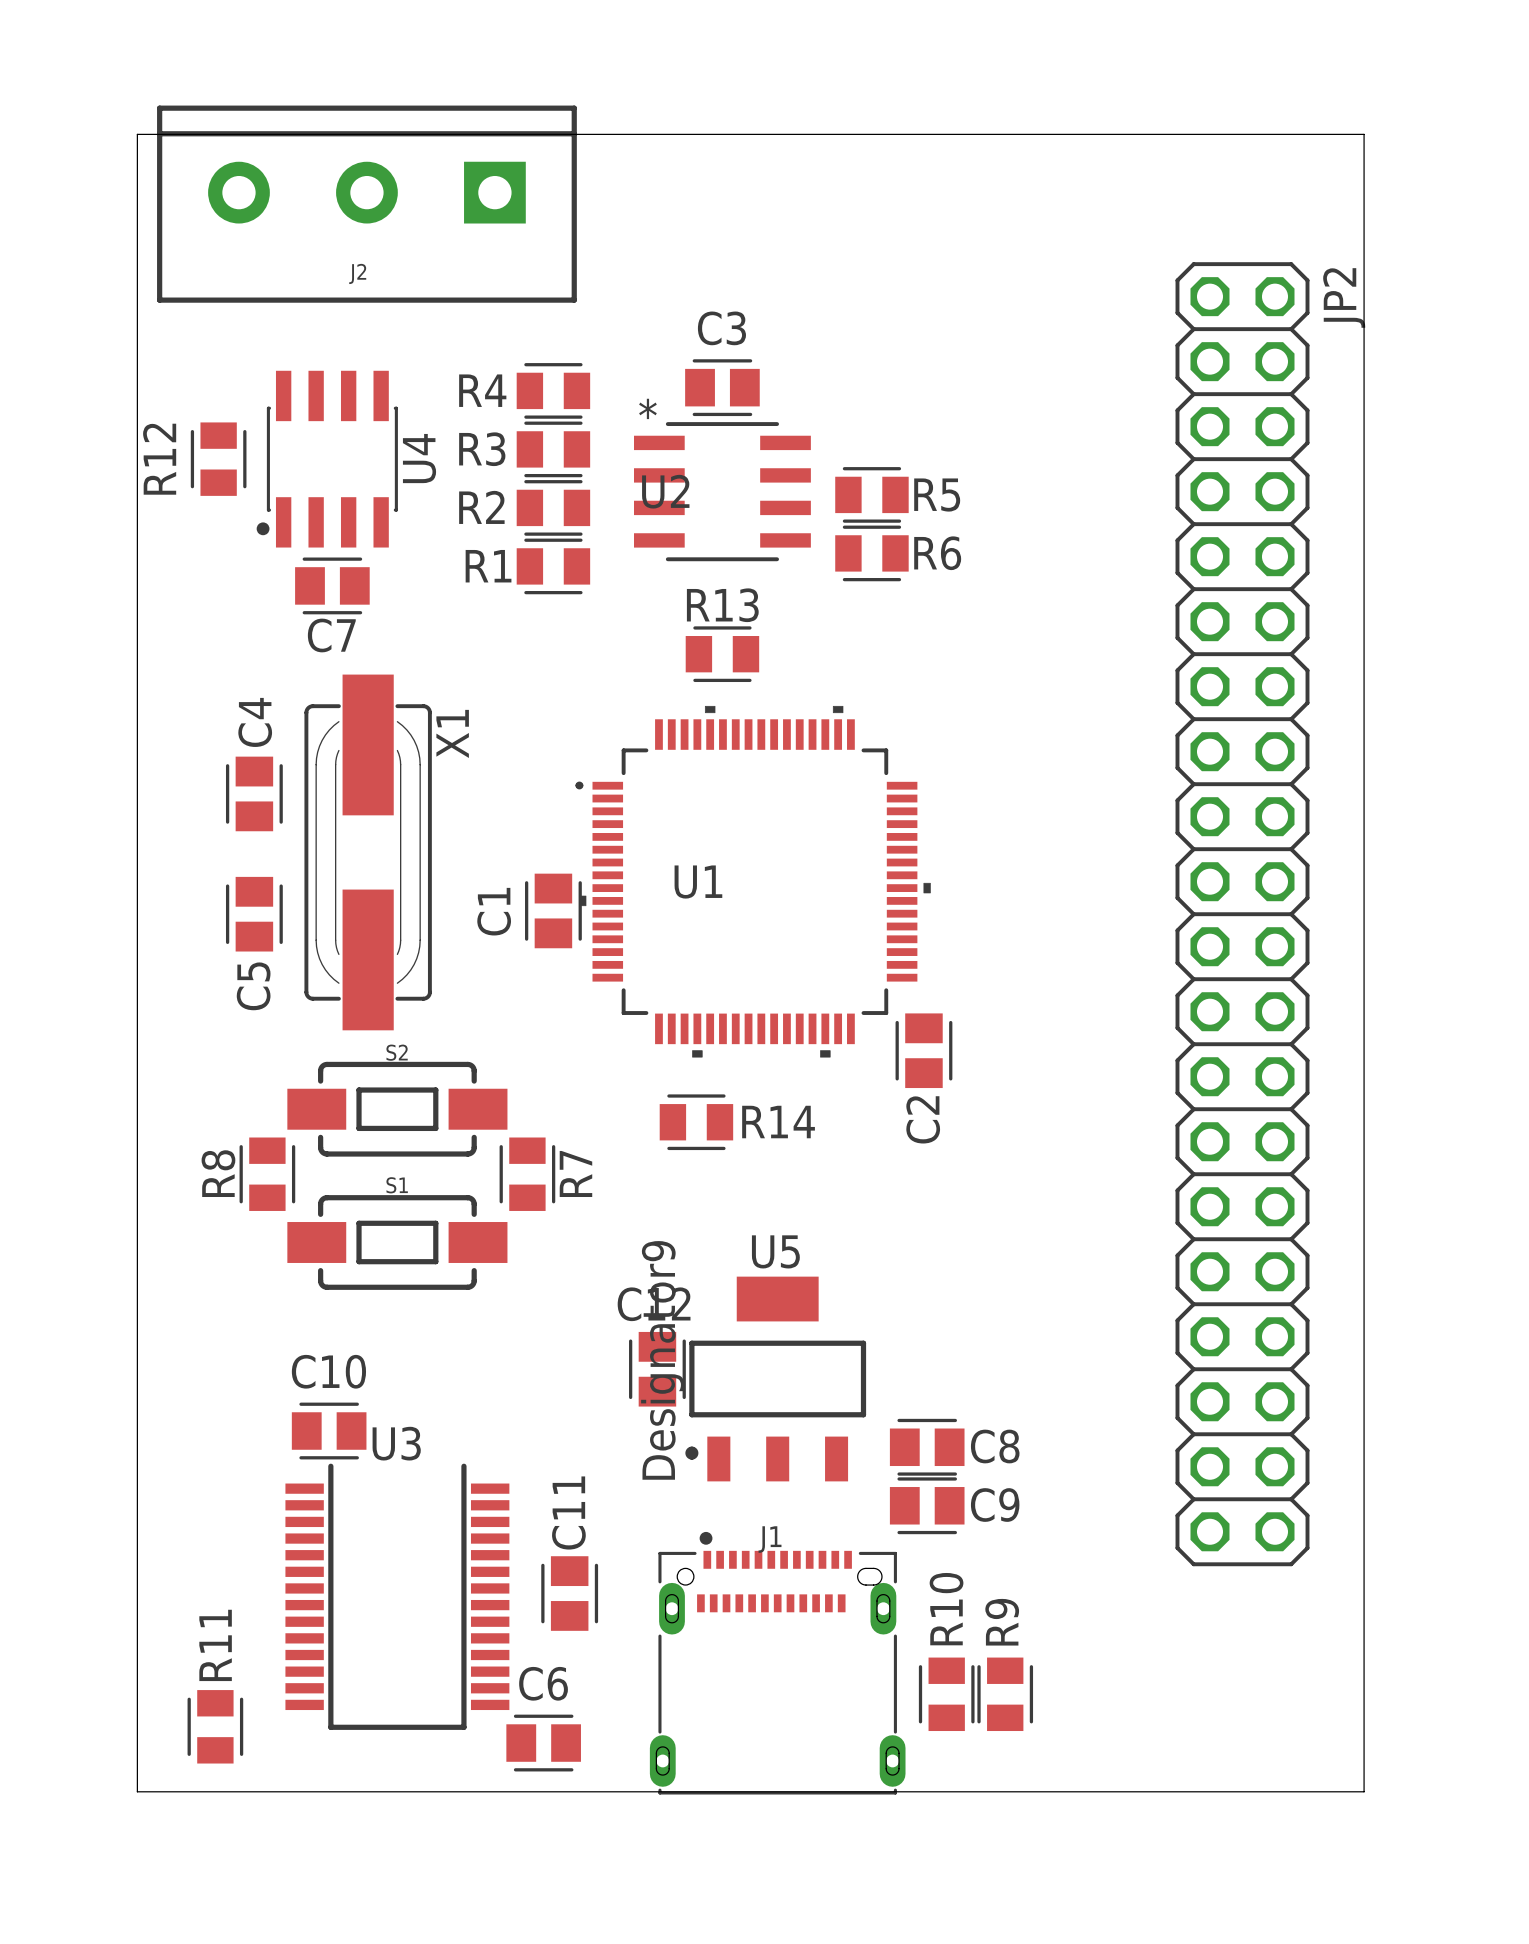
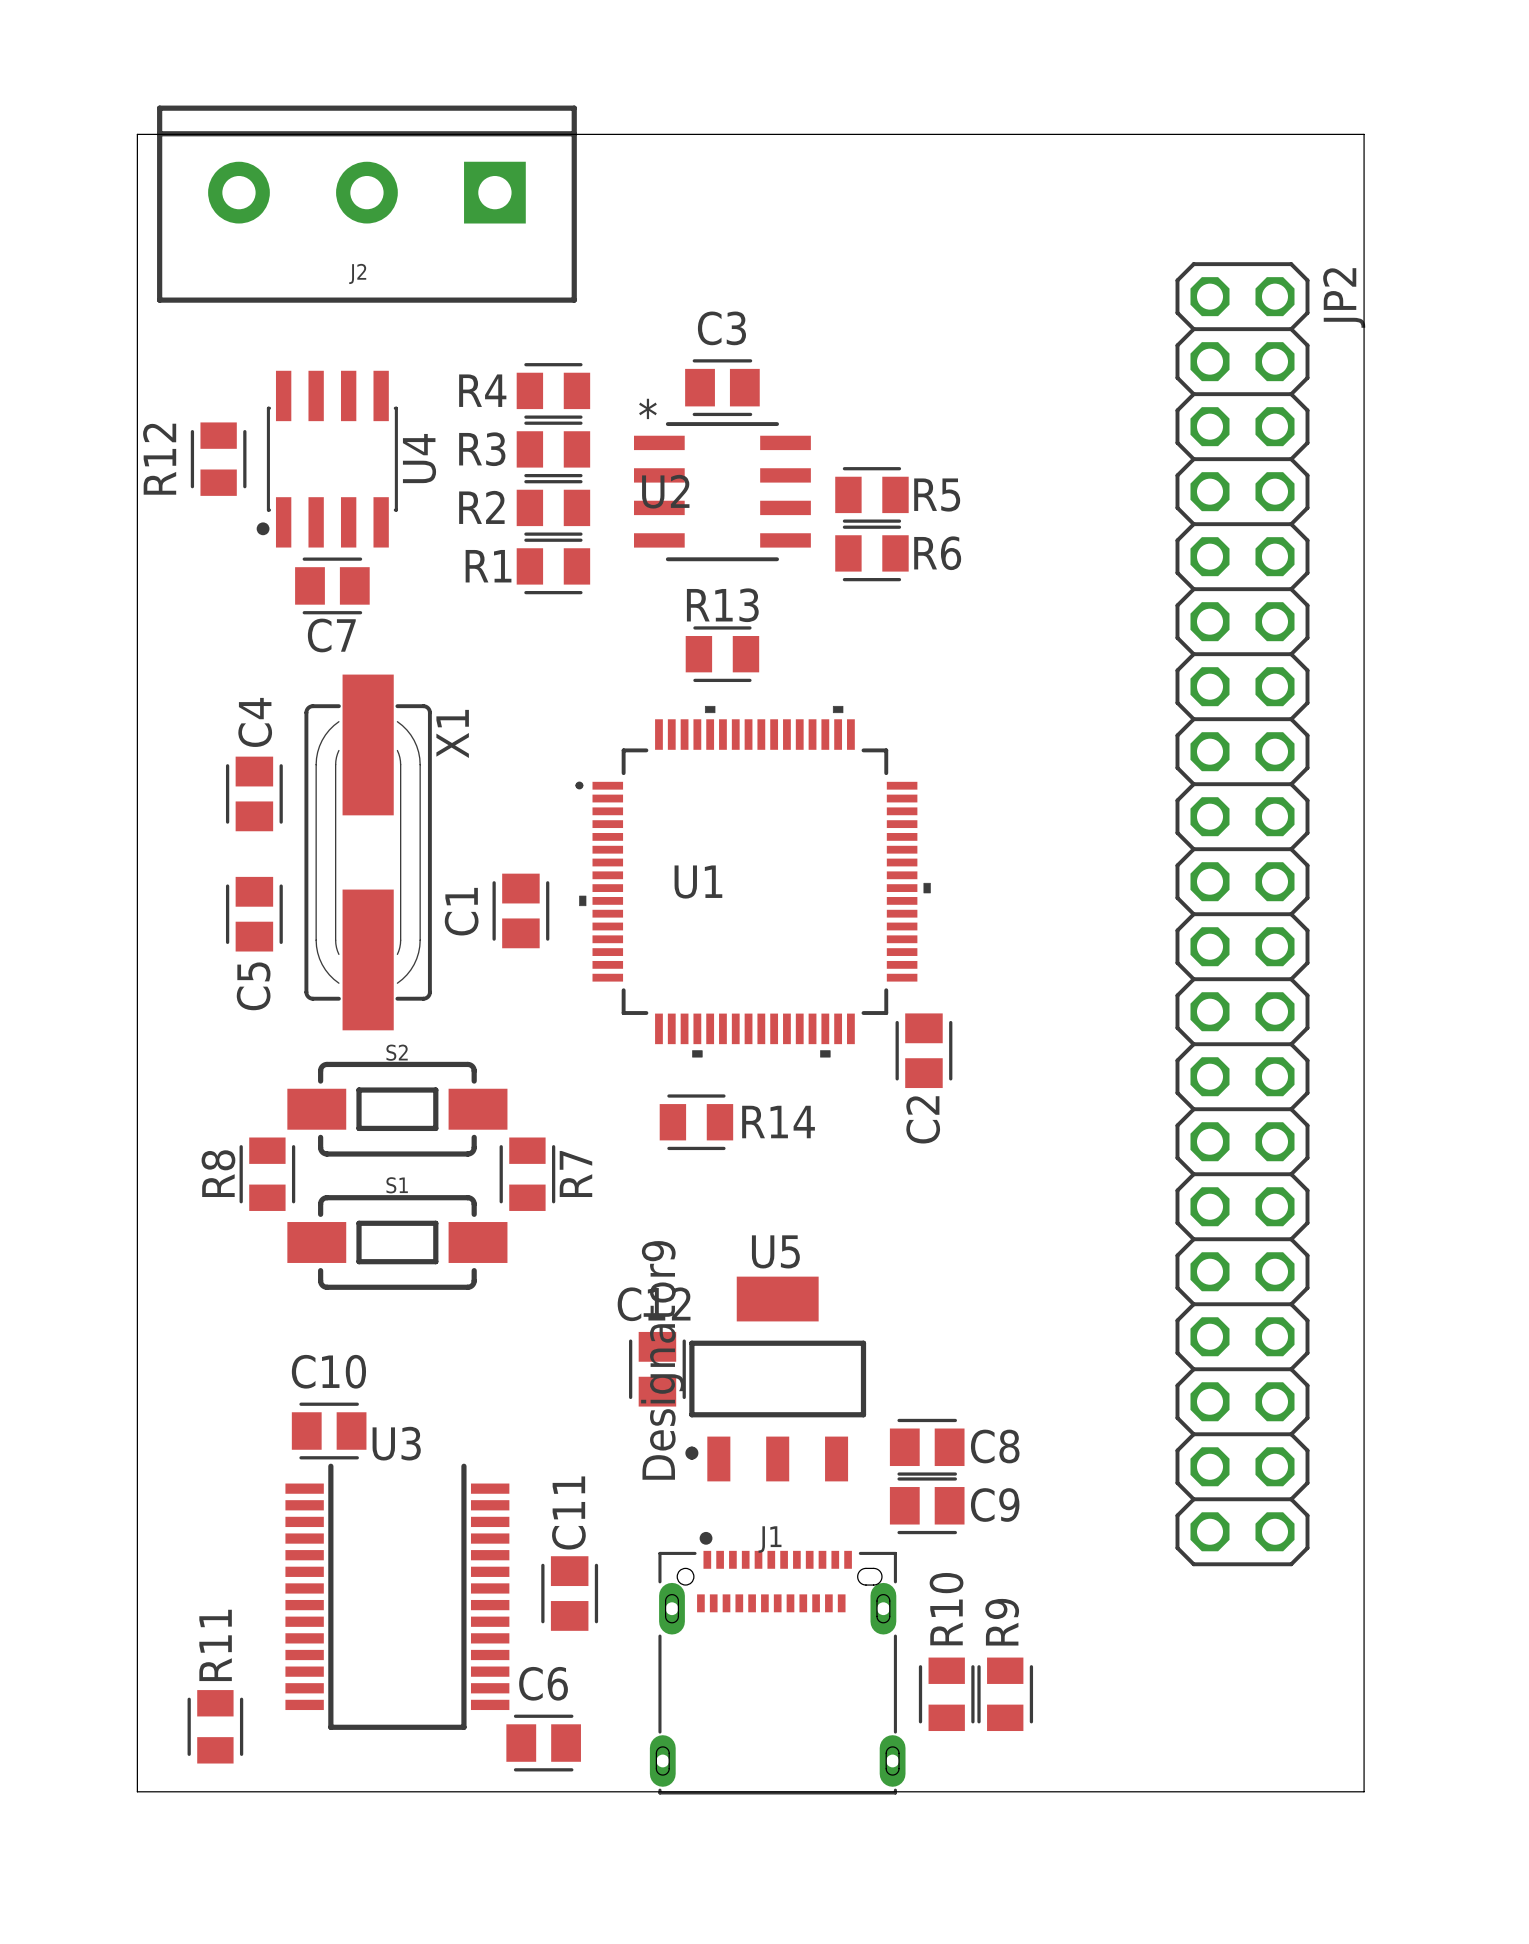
C1 position: (553, 910) -> (520, 910)

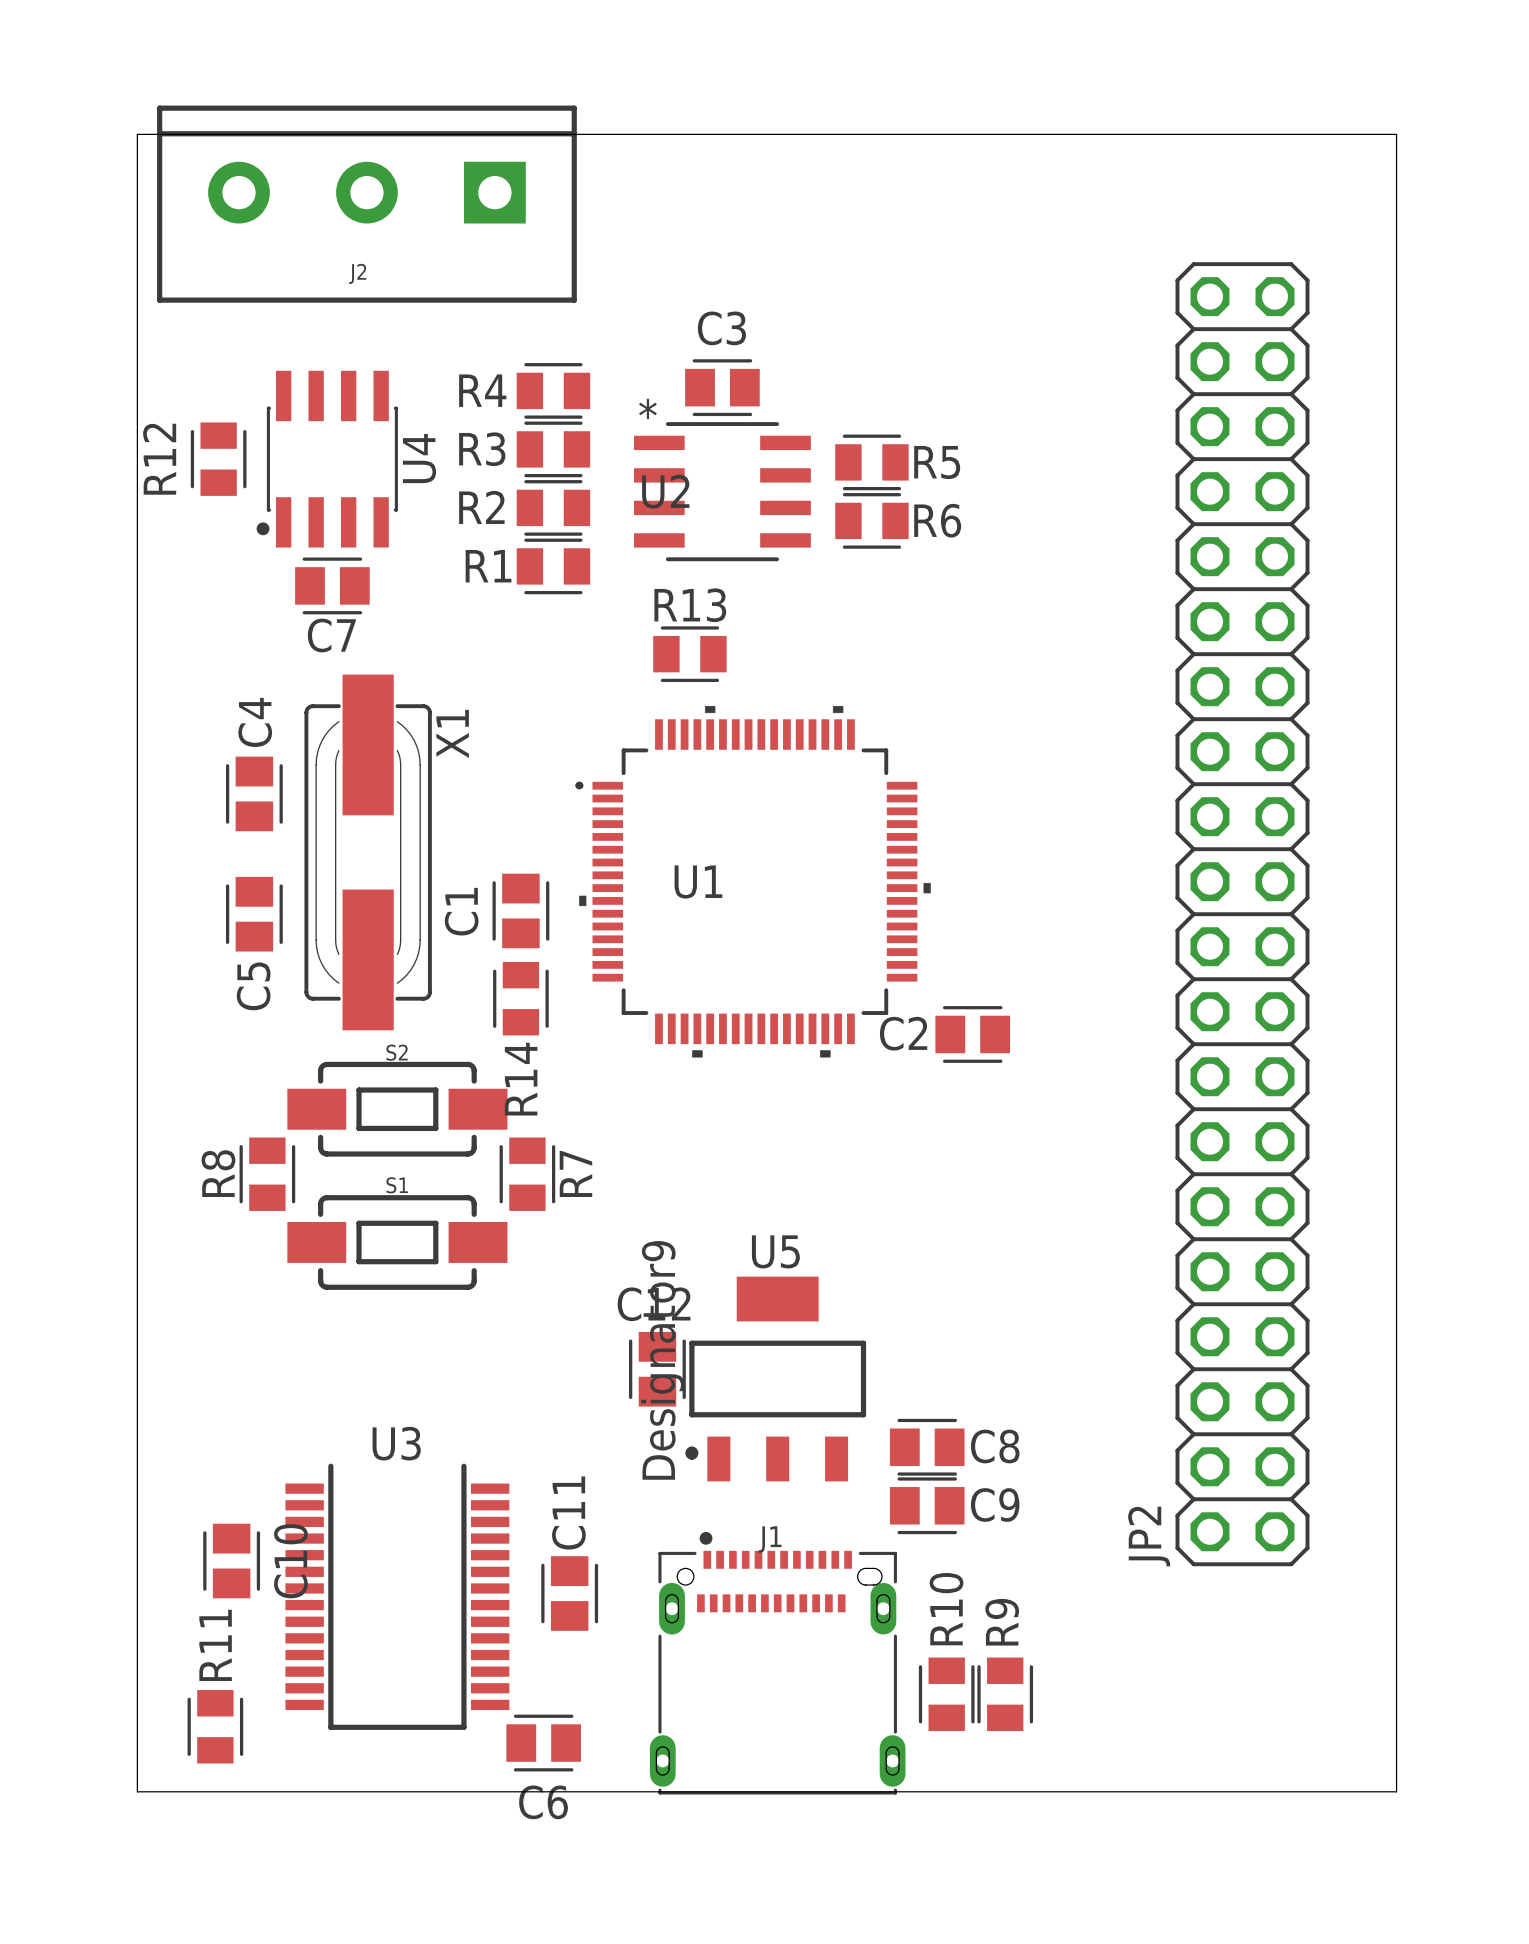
board edge: (1364, 134) (1364, 1791) -> (1364, 134) (1396, 134) (1396, 1791) (1364, 1791)
JP2 name position: JP2 (1344, 297) -> JP2 (1149, 1536)
R5 position: (871, 494) -> (871, 462)
R6 position: (871, 553) -> (871, 520)
R13 position: (722, 654) -> (689, 654)
C2 rotation: 0° (923, 1050) -> 90° clockwise (972, 1034)
C2 position: (923, 1050) -> (972, 1034)
R14 rotation: 0° (696, 1122) -> 90° clockwise (520, 998)
R14 position: (696, 1122) -> (520, 998)
C10 rotation: 0° (329, 1431) -> 90° clockwise (231, 1561)
C10 position: (329, 1431) -> (231, 1561)
C6 name position: C6 (543, 1683) -> C6 (543, 1802)

